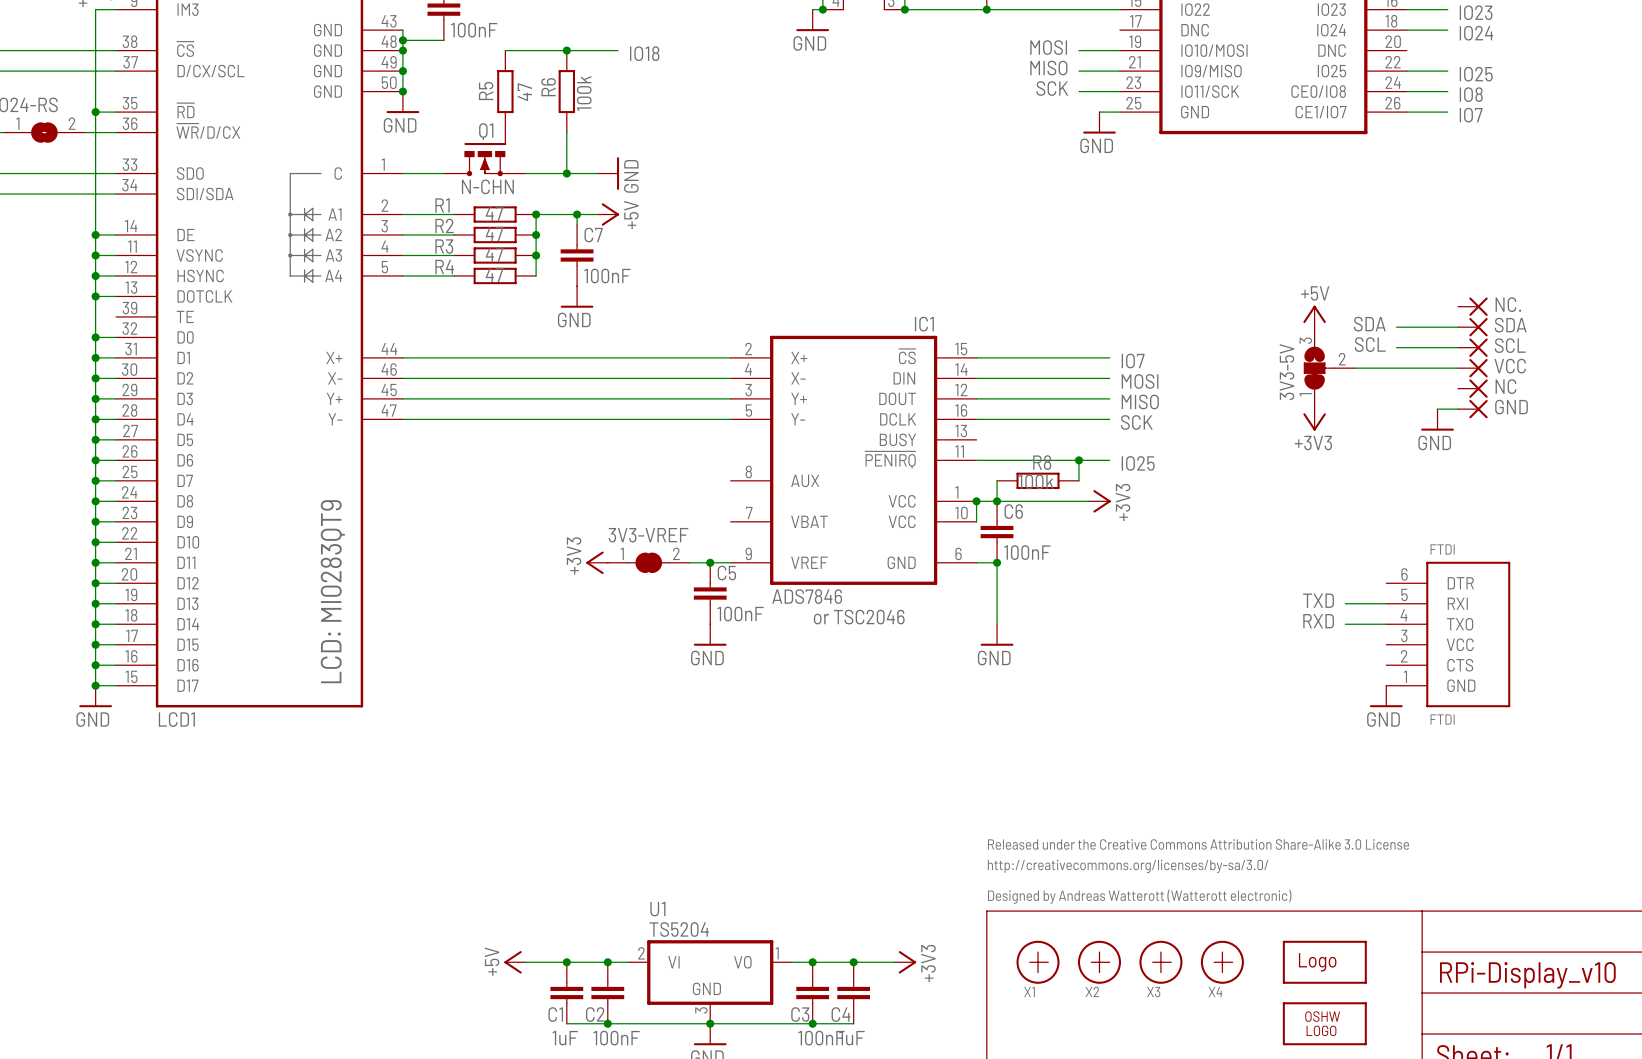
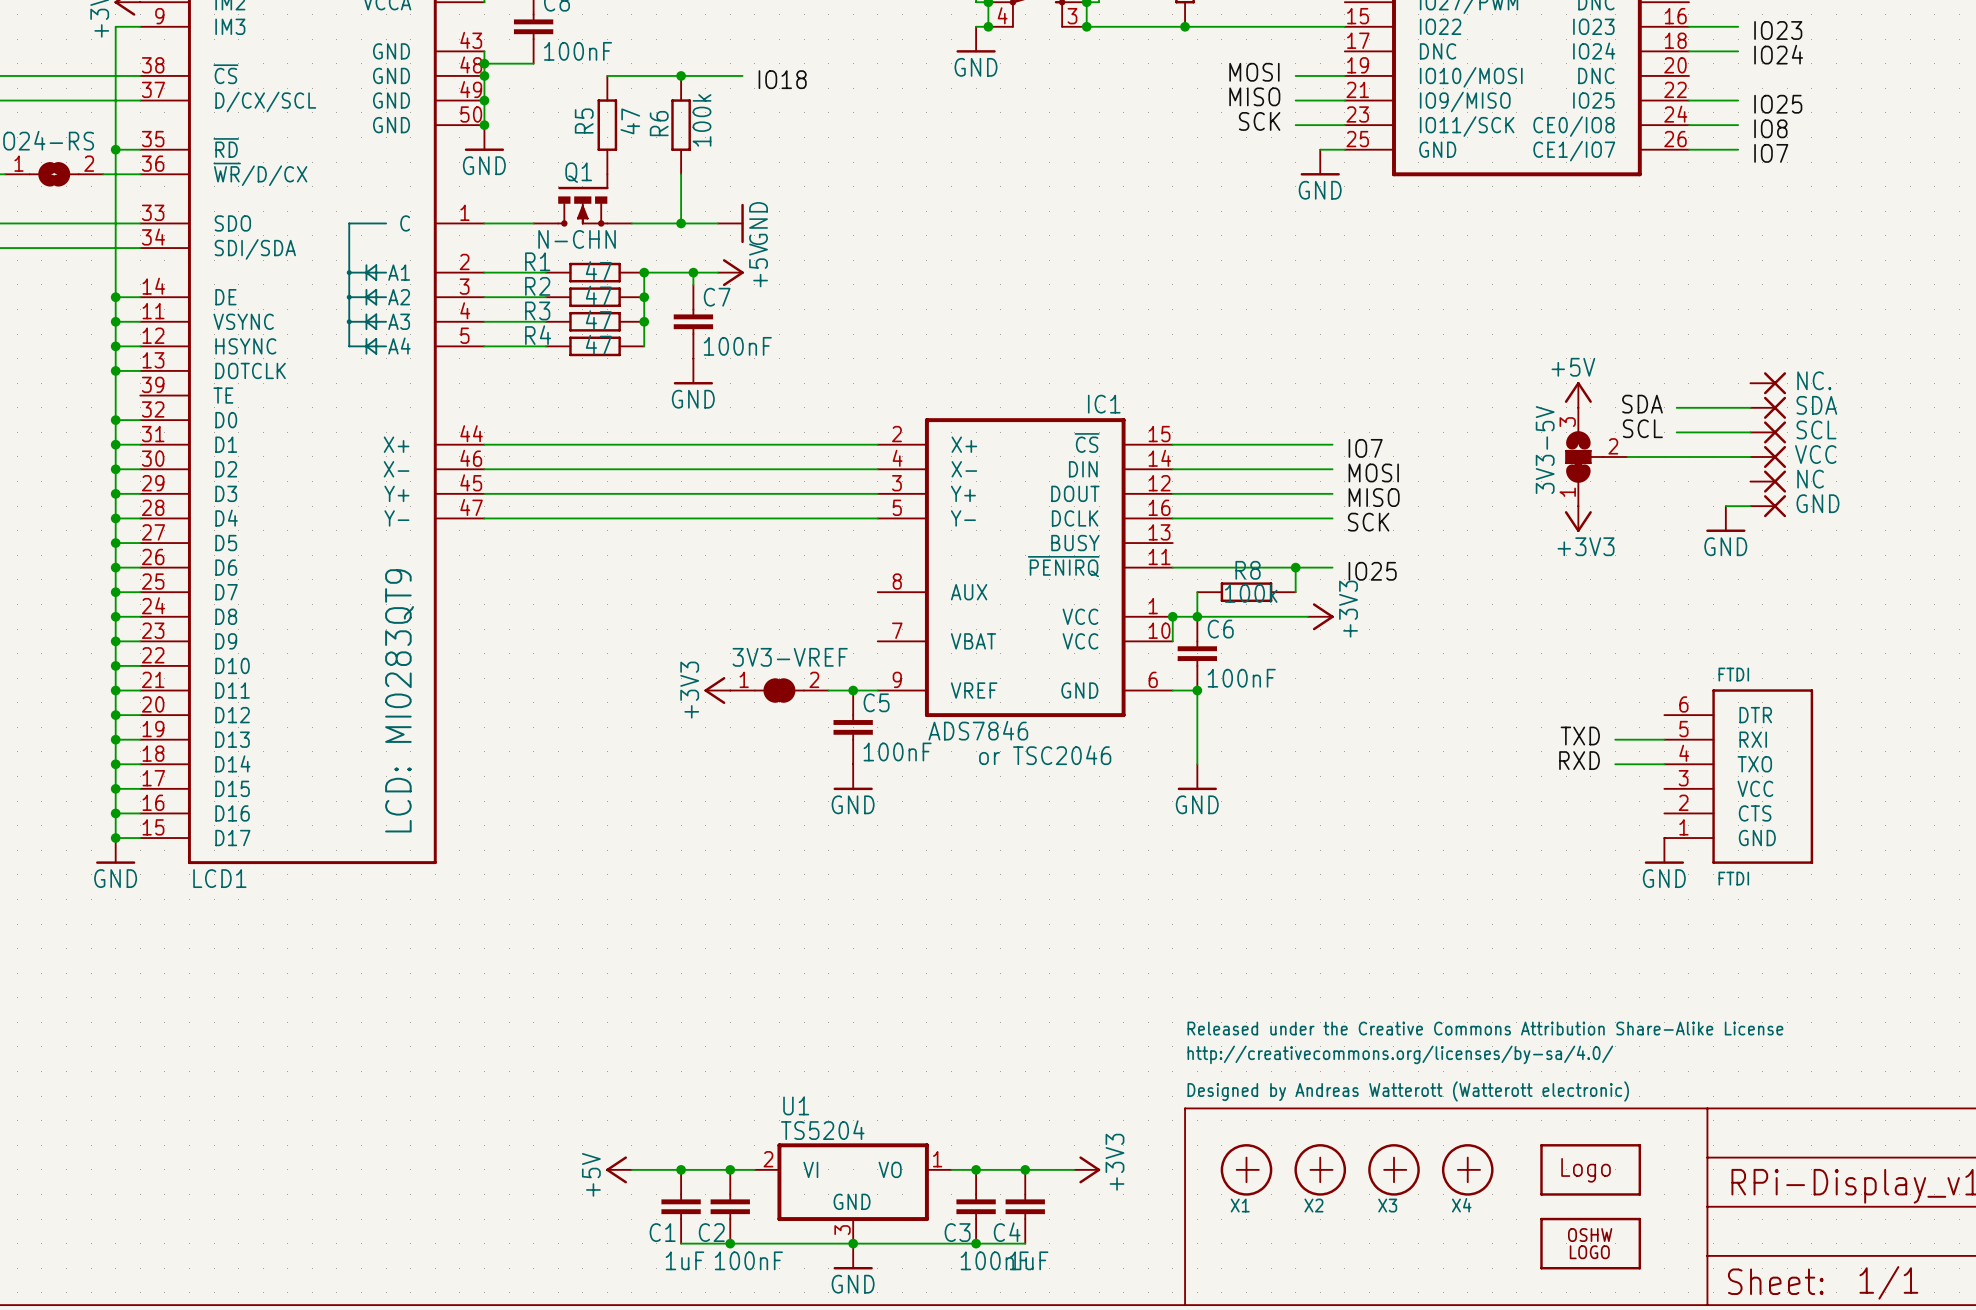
text: Released under the Creative Commons Attribution Share-Alike 3.0 License (1198, 844) -> Released under the Creative Commons Attribution Share-Alike License (1485, 1028)
text: http://creativecommons.org/licenses/by-sa/3.0/ (1128, 866) -> http://creativecommons.org/licenses/by-sa/4.0/ (1400, 1054)

